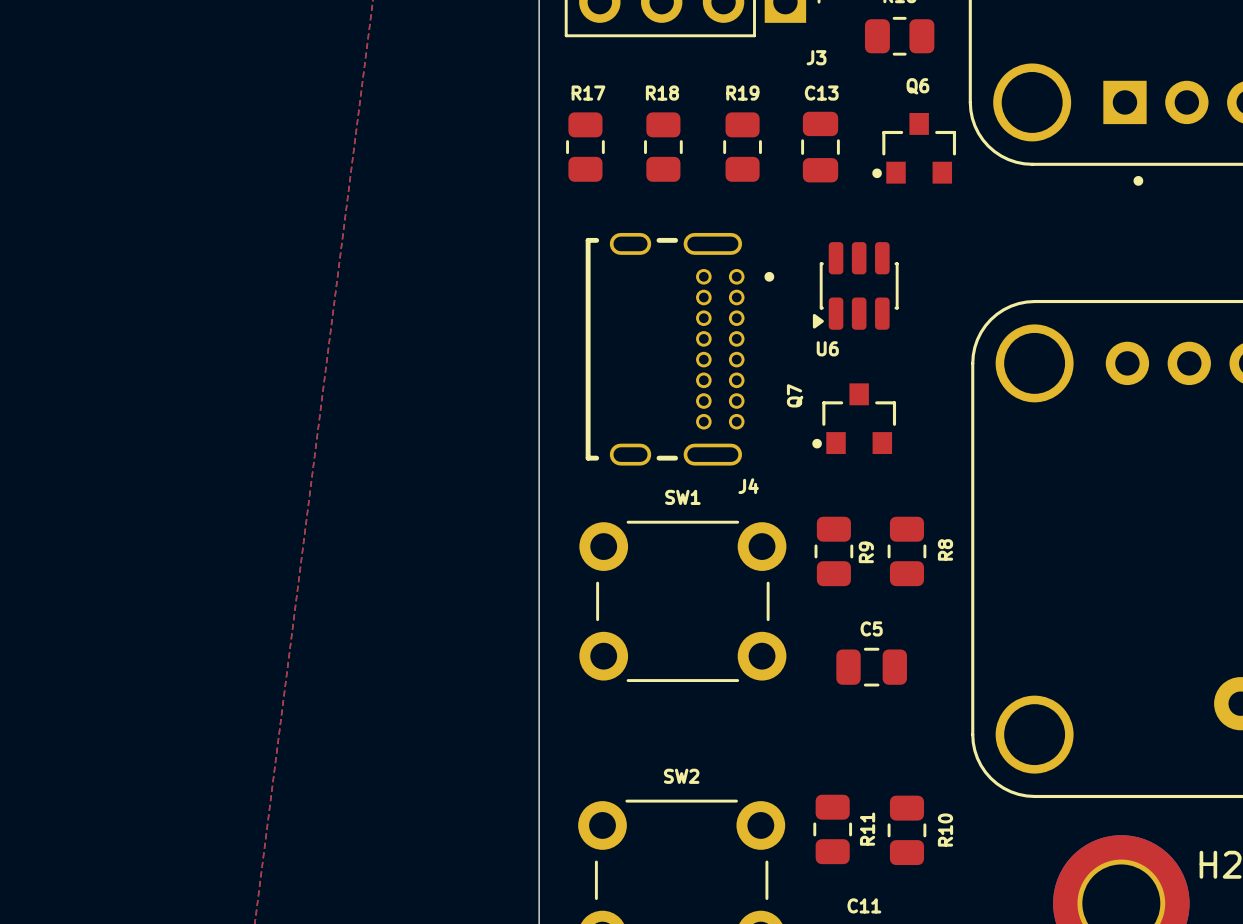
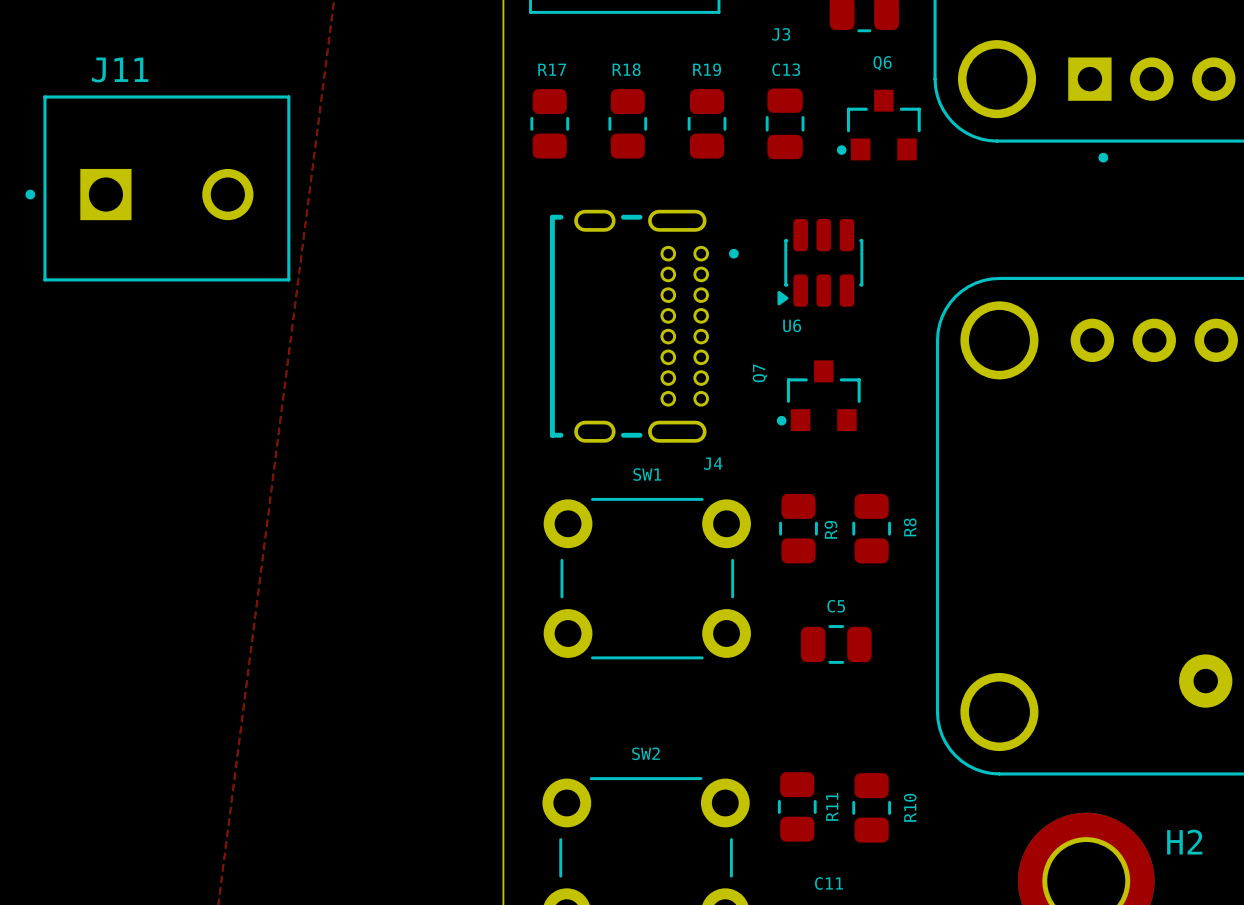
J11: none -> (157, 188)

